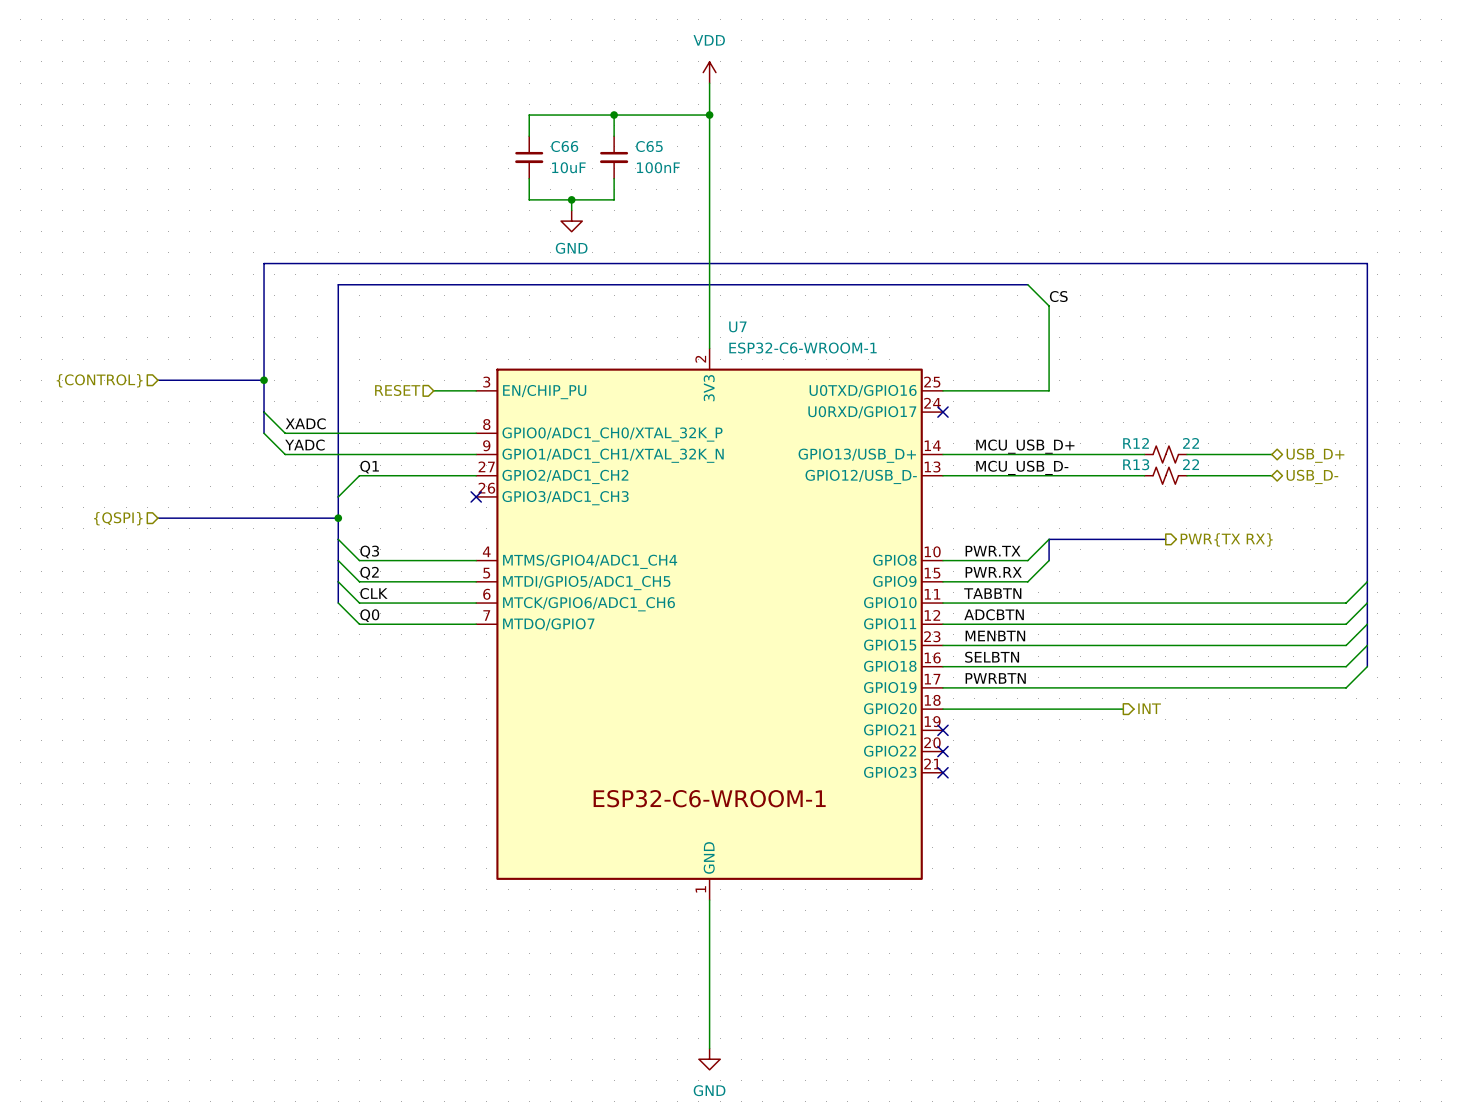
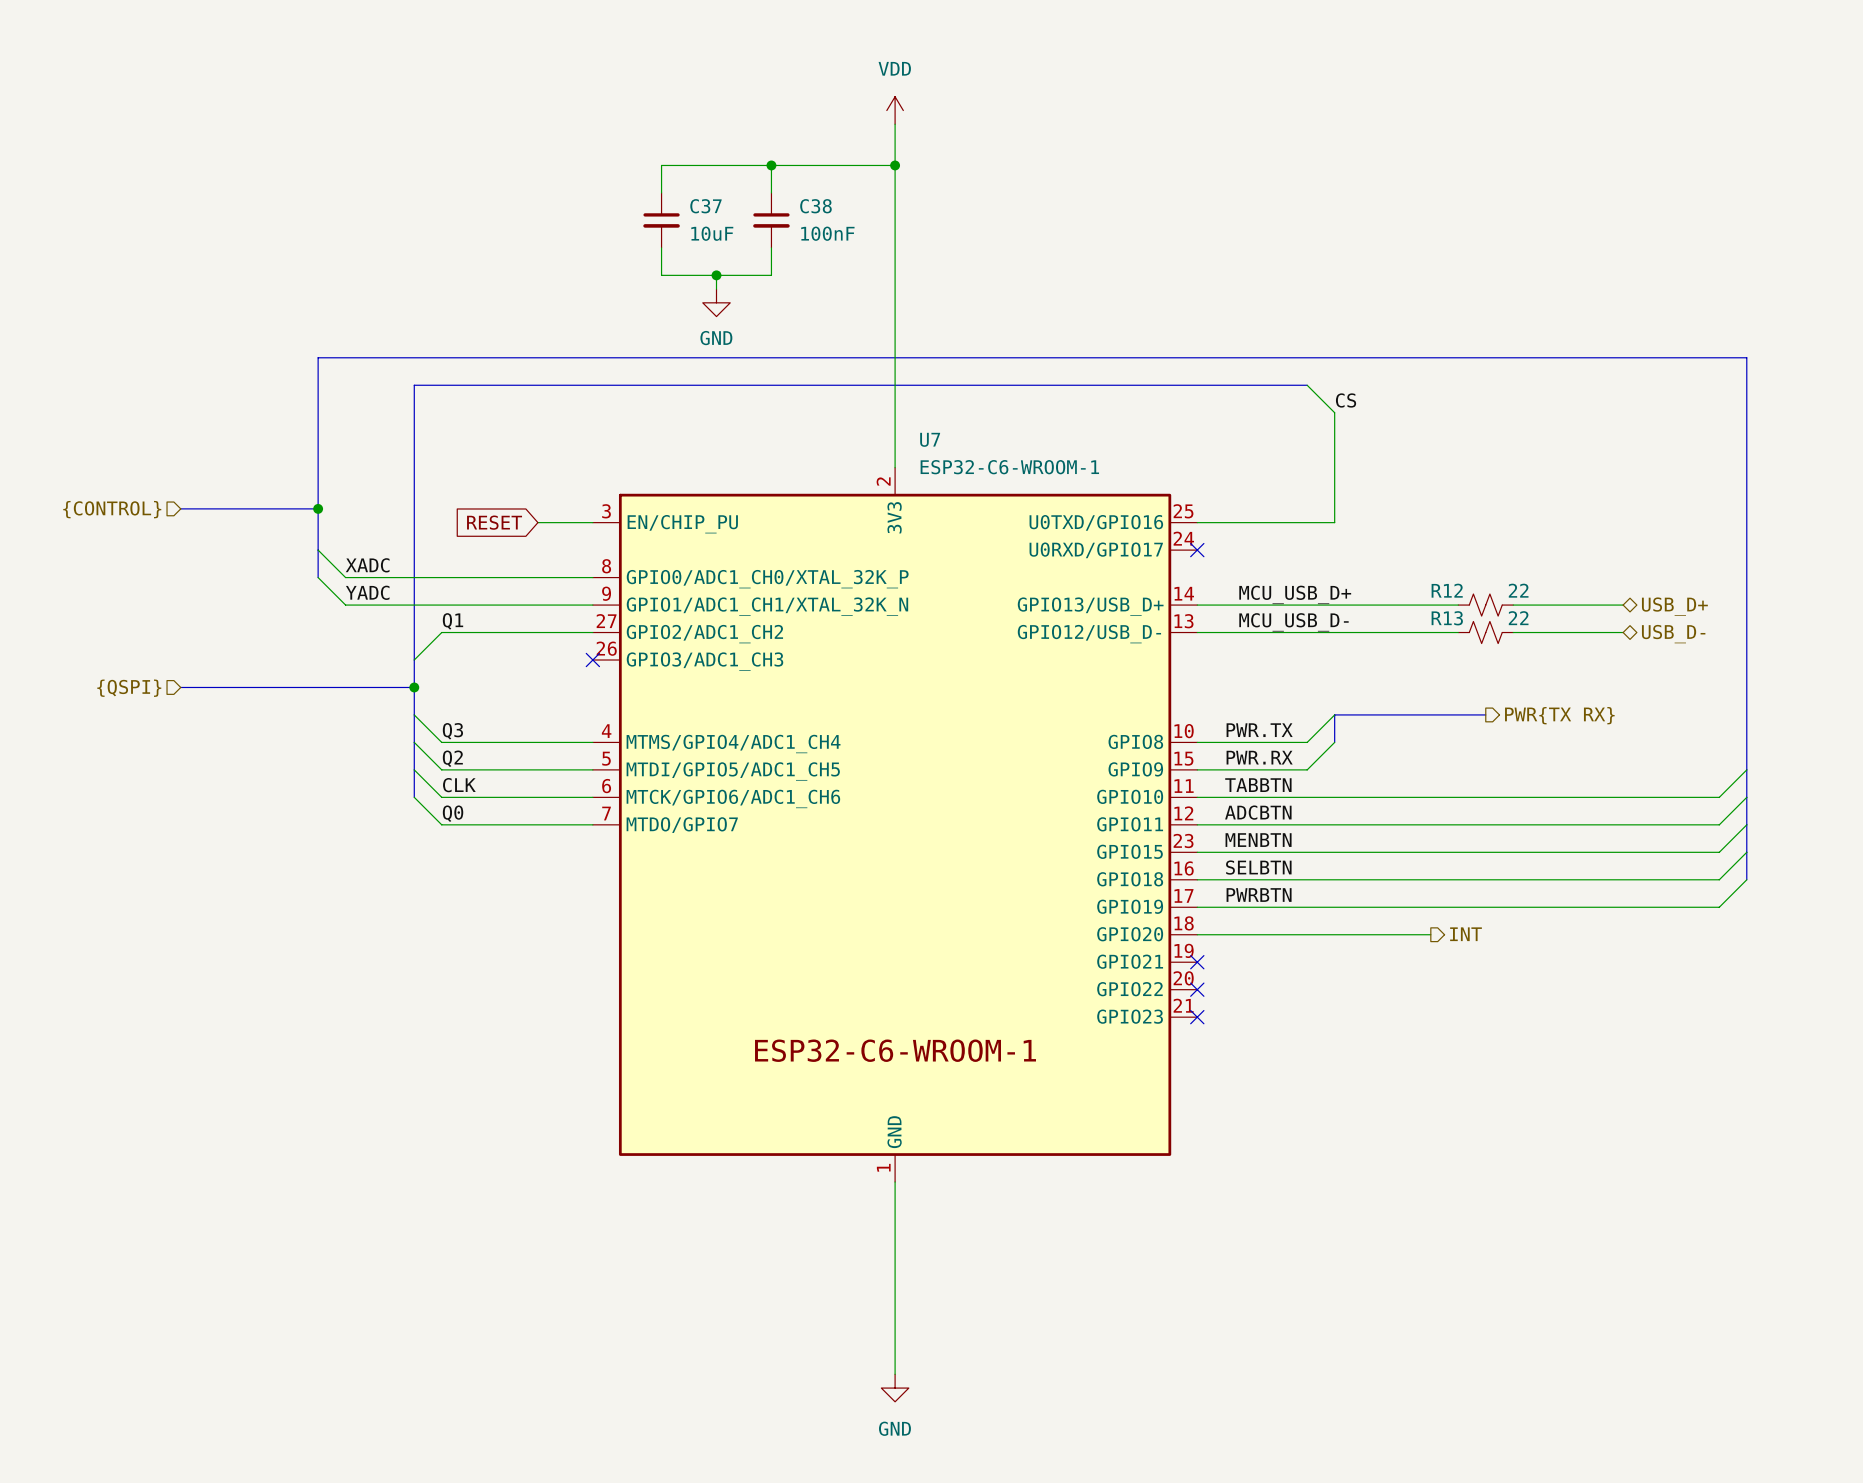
C66 name: C66 (564, 146) -> C37 (705, 206)
C65 name: C65 (649, 146) -> C38 (815, 206)
hierarchical label: RESET (397, 390) -> none
global label: none -> RESET (494, 522)

